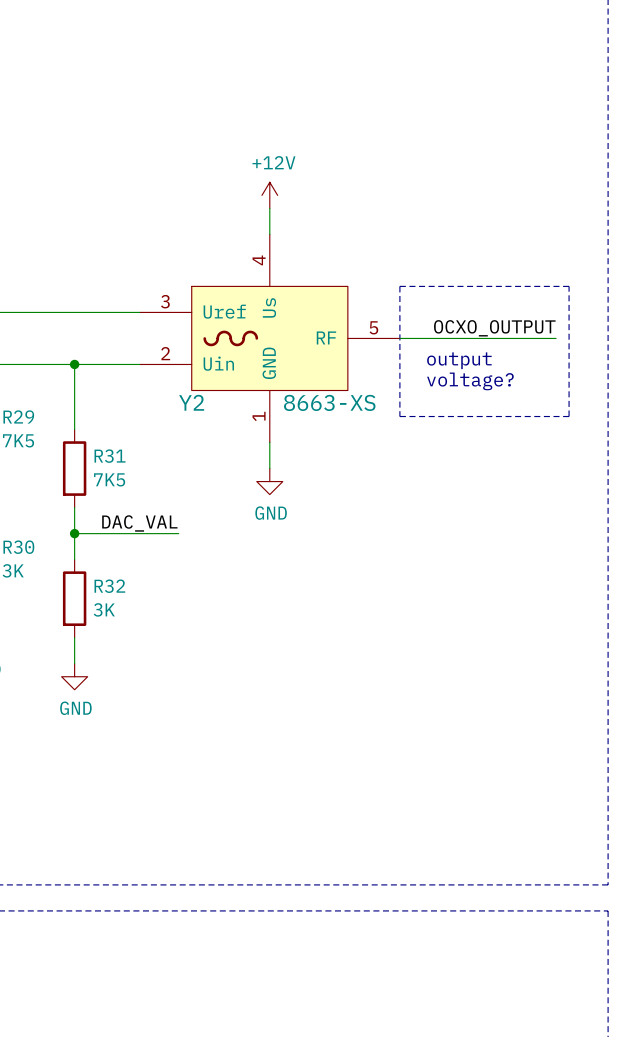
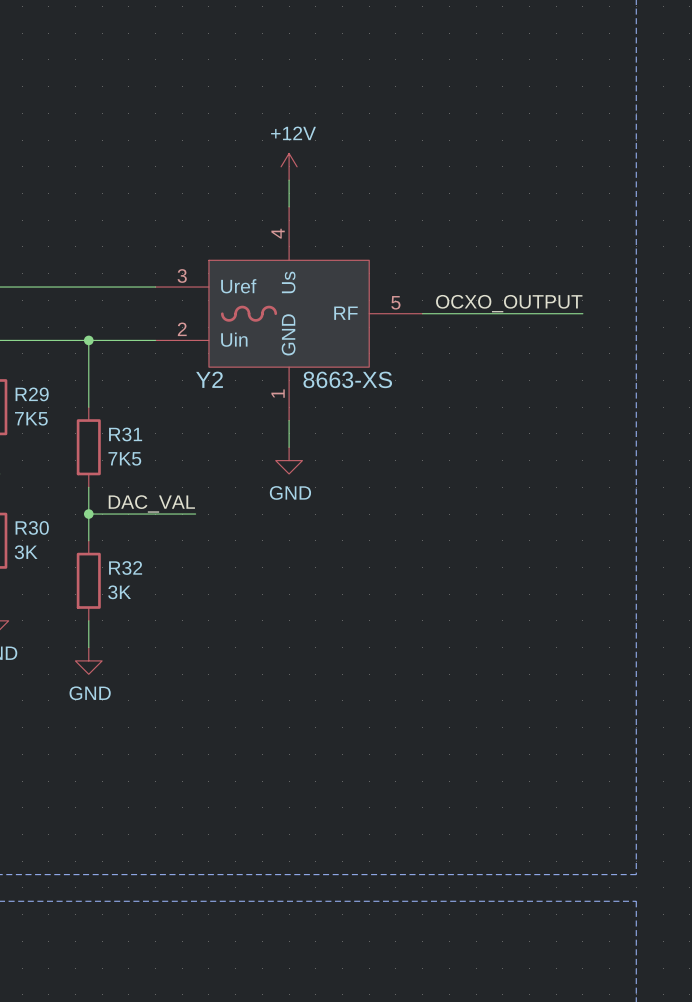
line: (399, 286) (399, 416) (569, 416) (569, 286) (399, 286) -> none
text: output (459, 360) -> none
text: voltage? (470, 381) -> none

